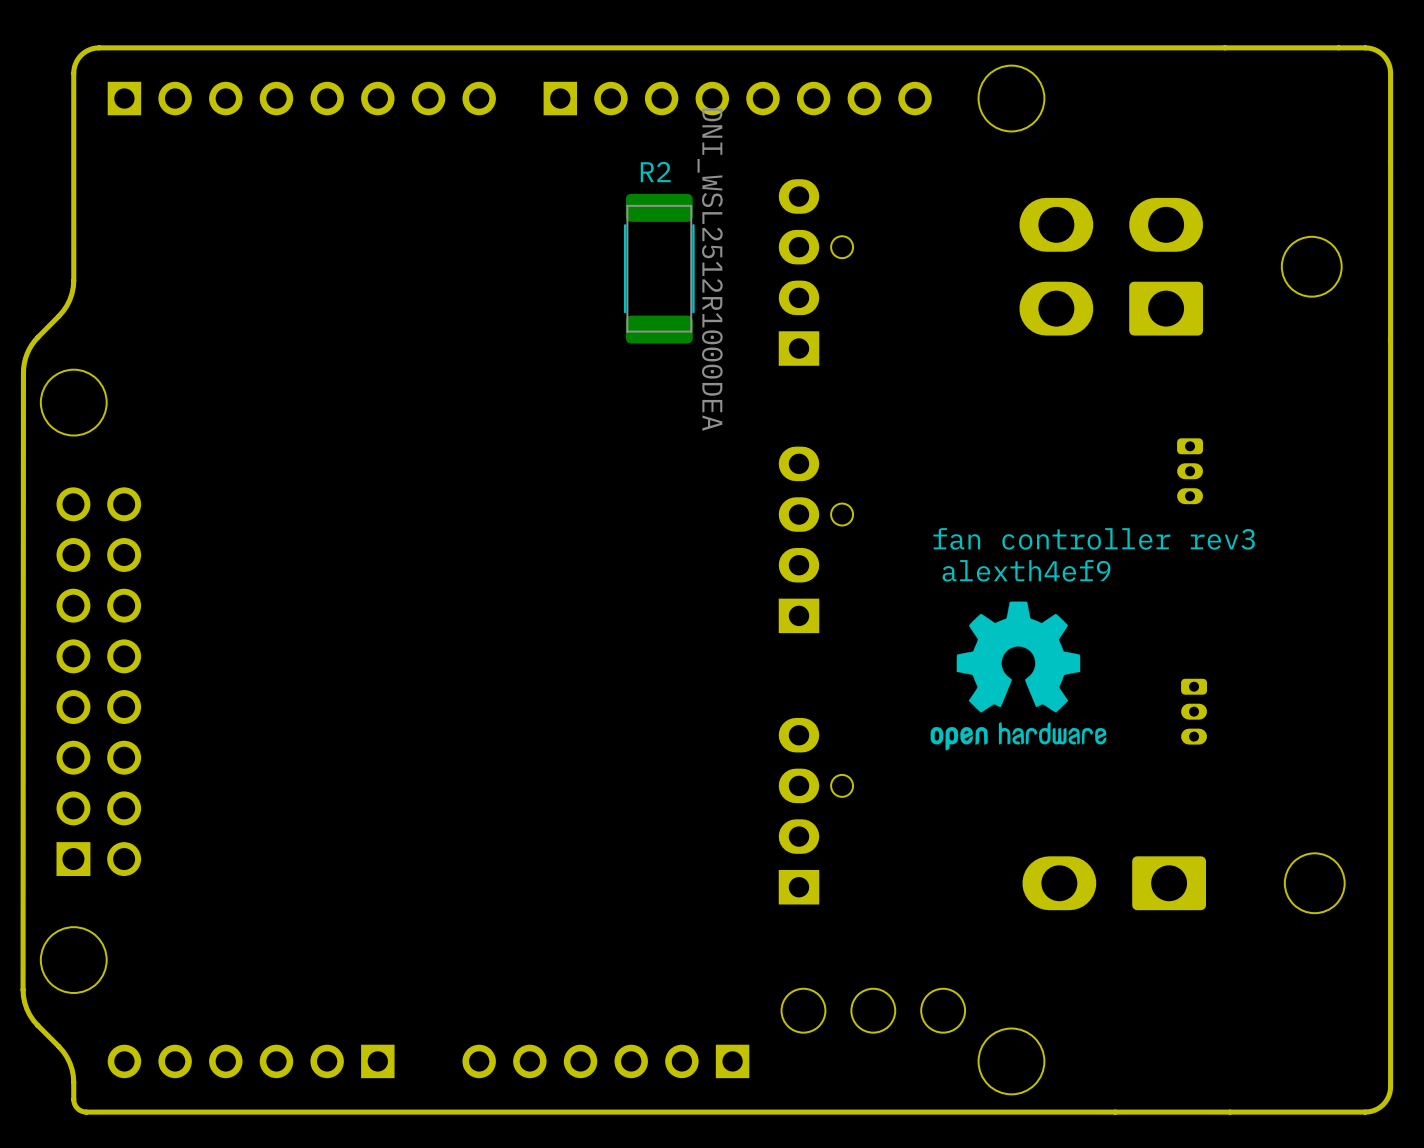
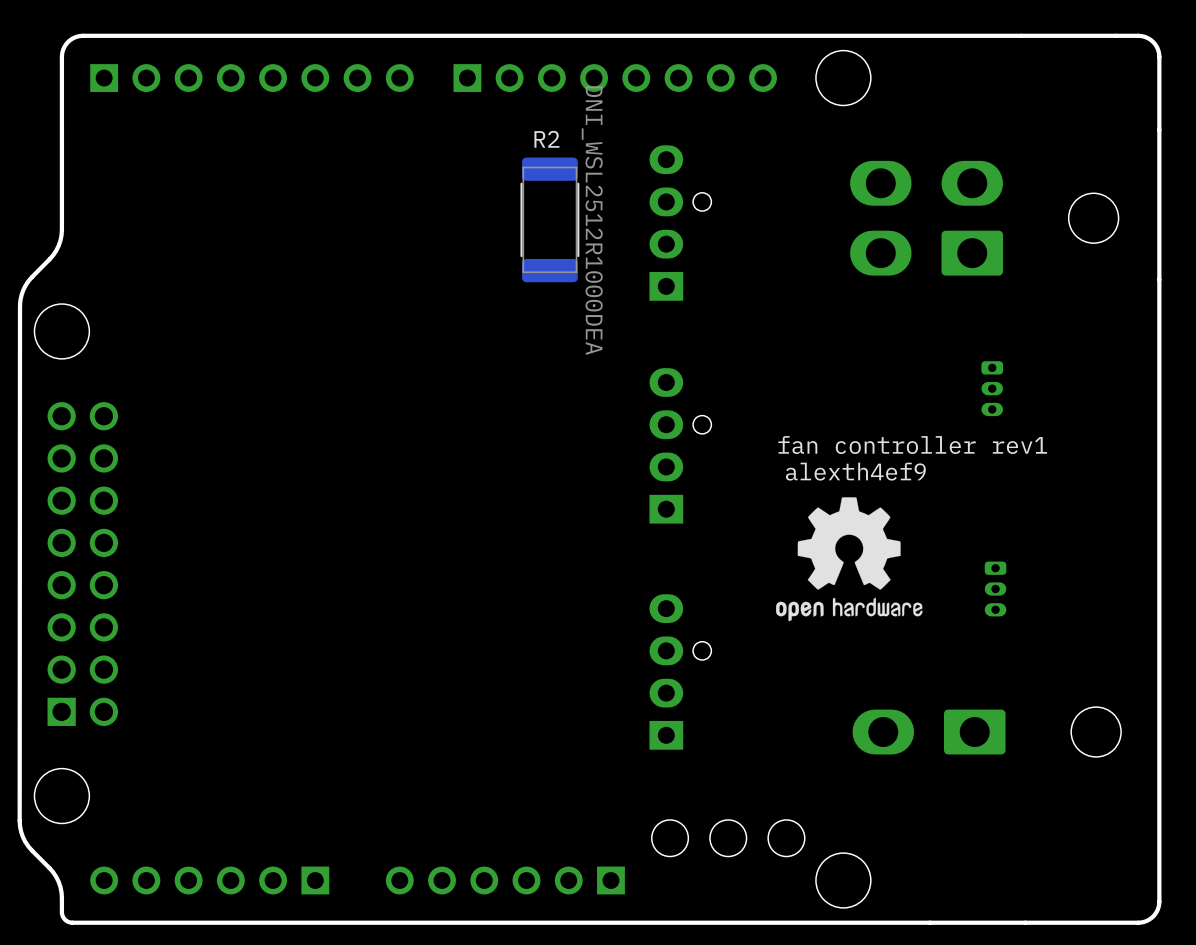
text: fan controller rev3 (1094, 538) -> fan controller rev1 (912, 445)

